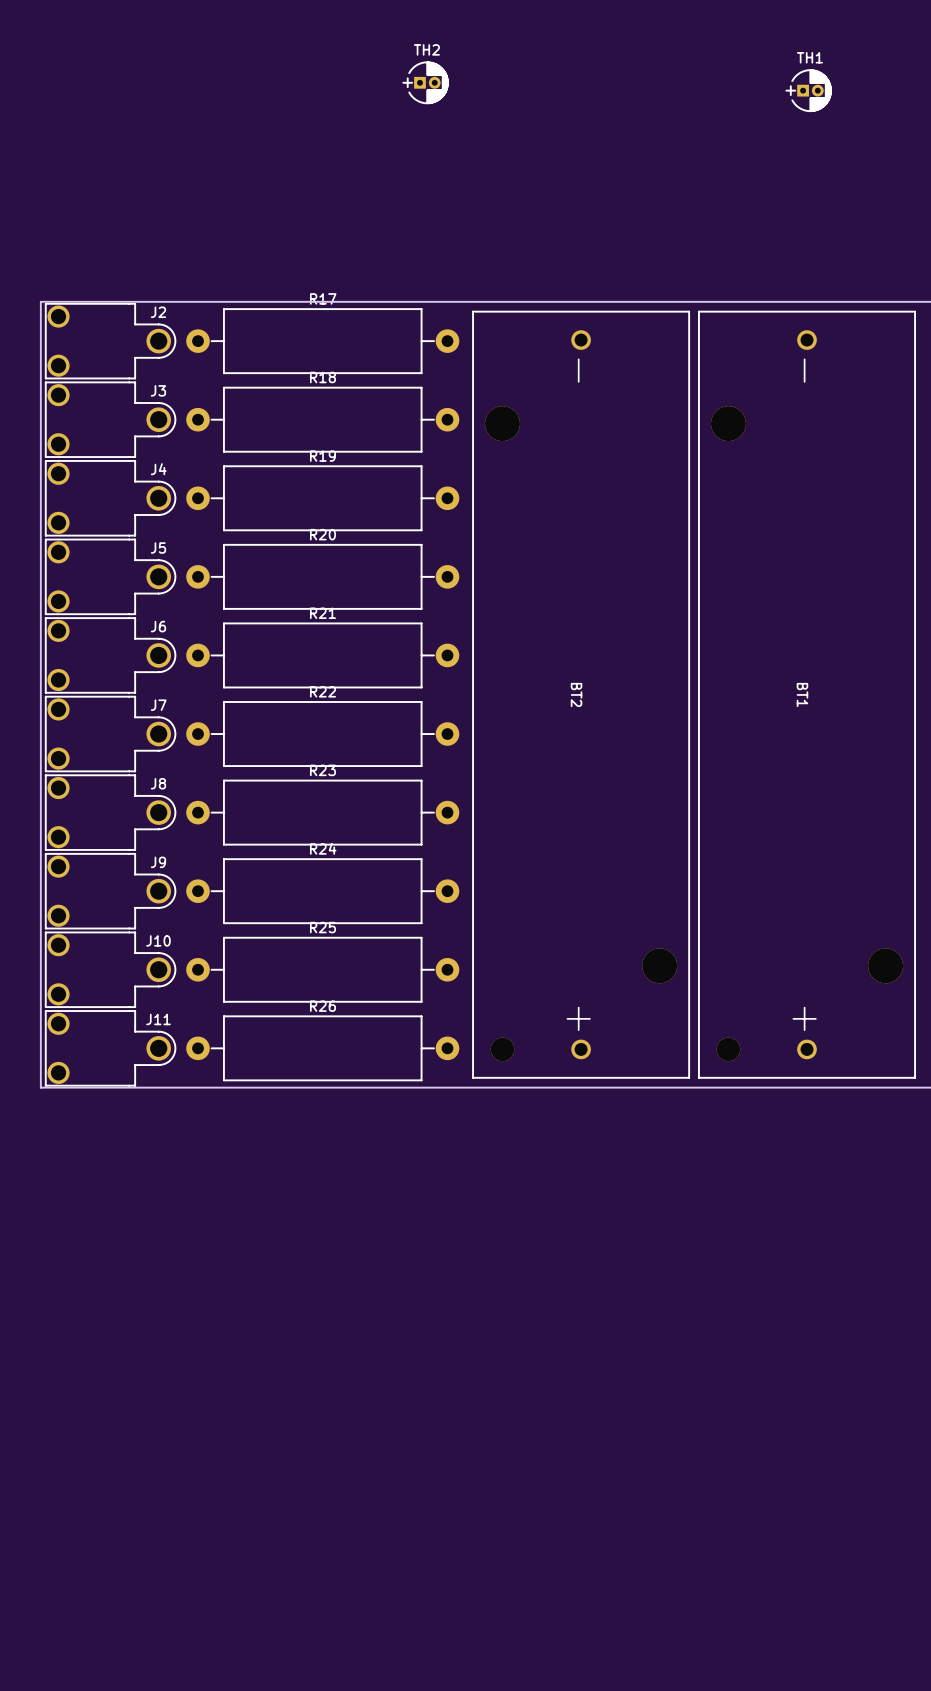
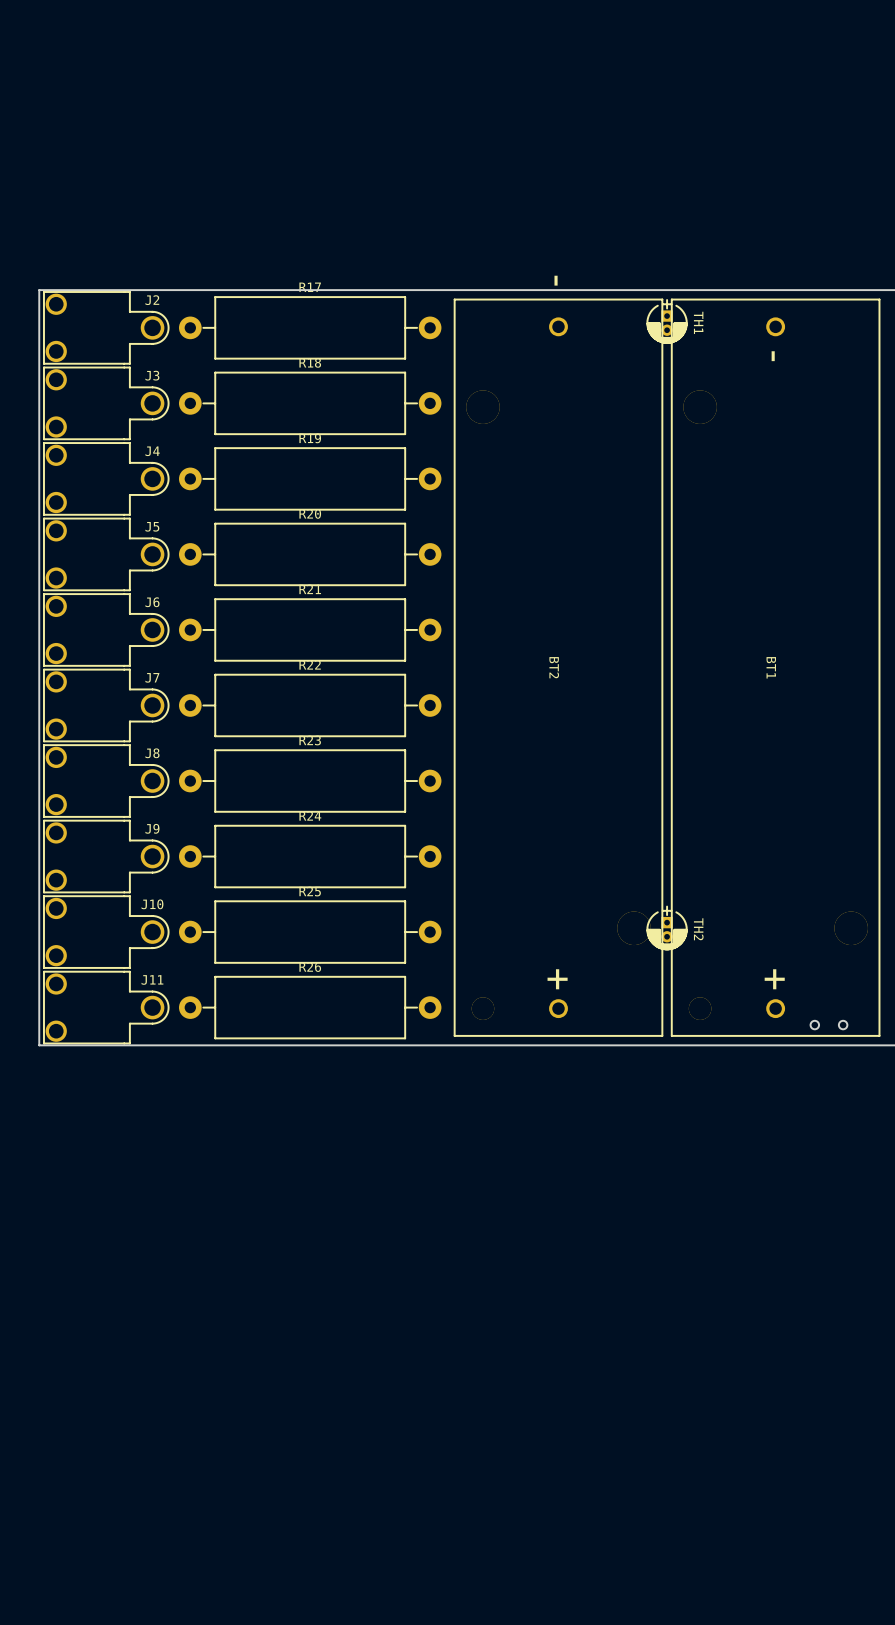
TH2 rotation: 0° (425, 82) -> 90° clockwise (667, 928)
TH2 position: (425, 82) -> (667, 928)
TH1 rotation: 0° (808, 90) -> 90° clockwise (667, 321)
TH1 position: (808, 90) -> (667, 321)
BT2 text position: - (578, 370) -> - (556, 280)
part: none -> (828, 1025)

